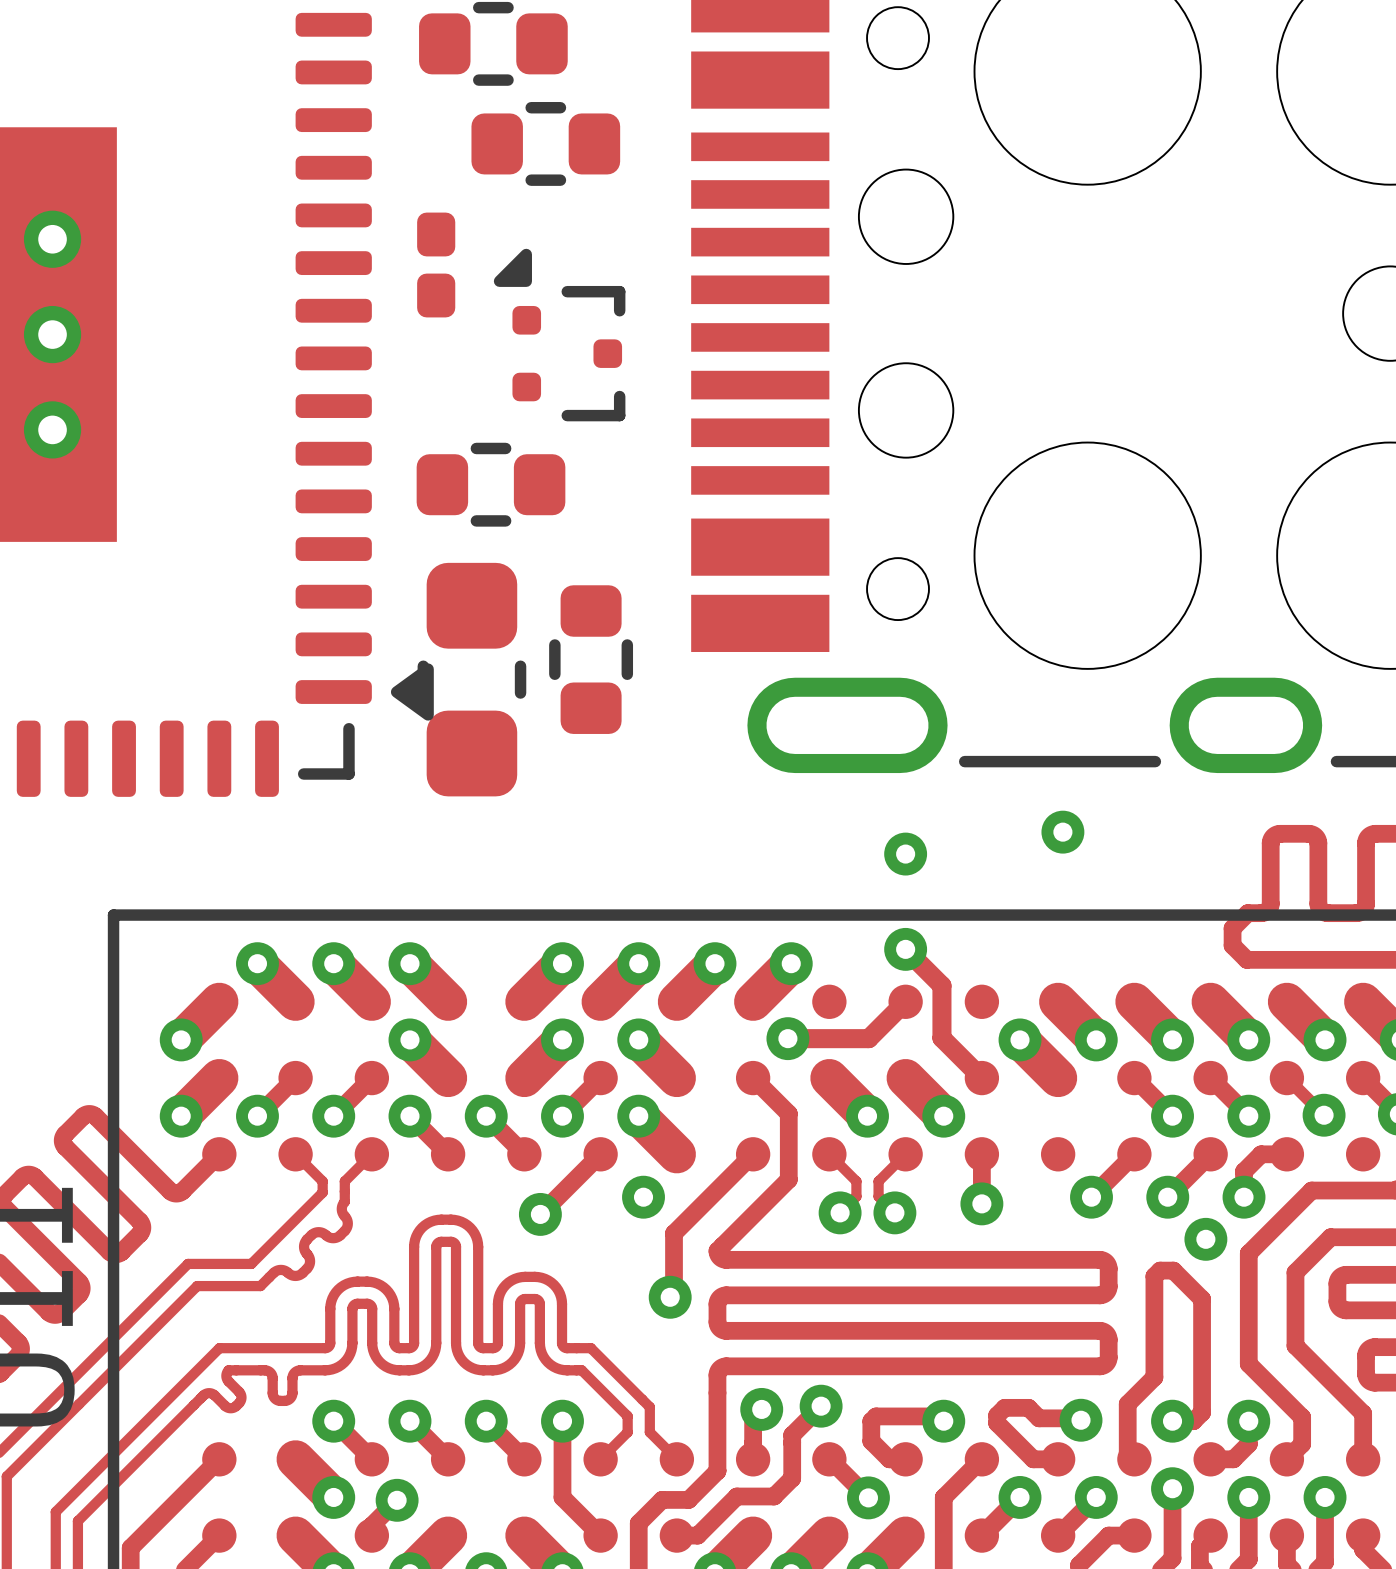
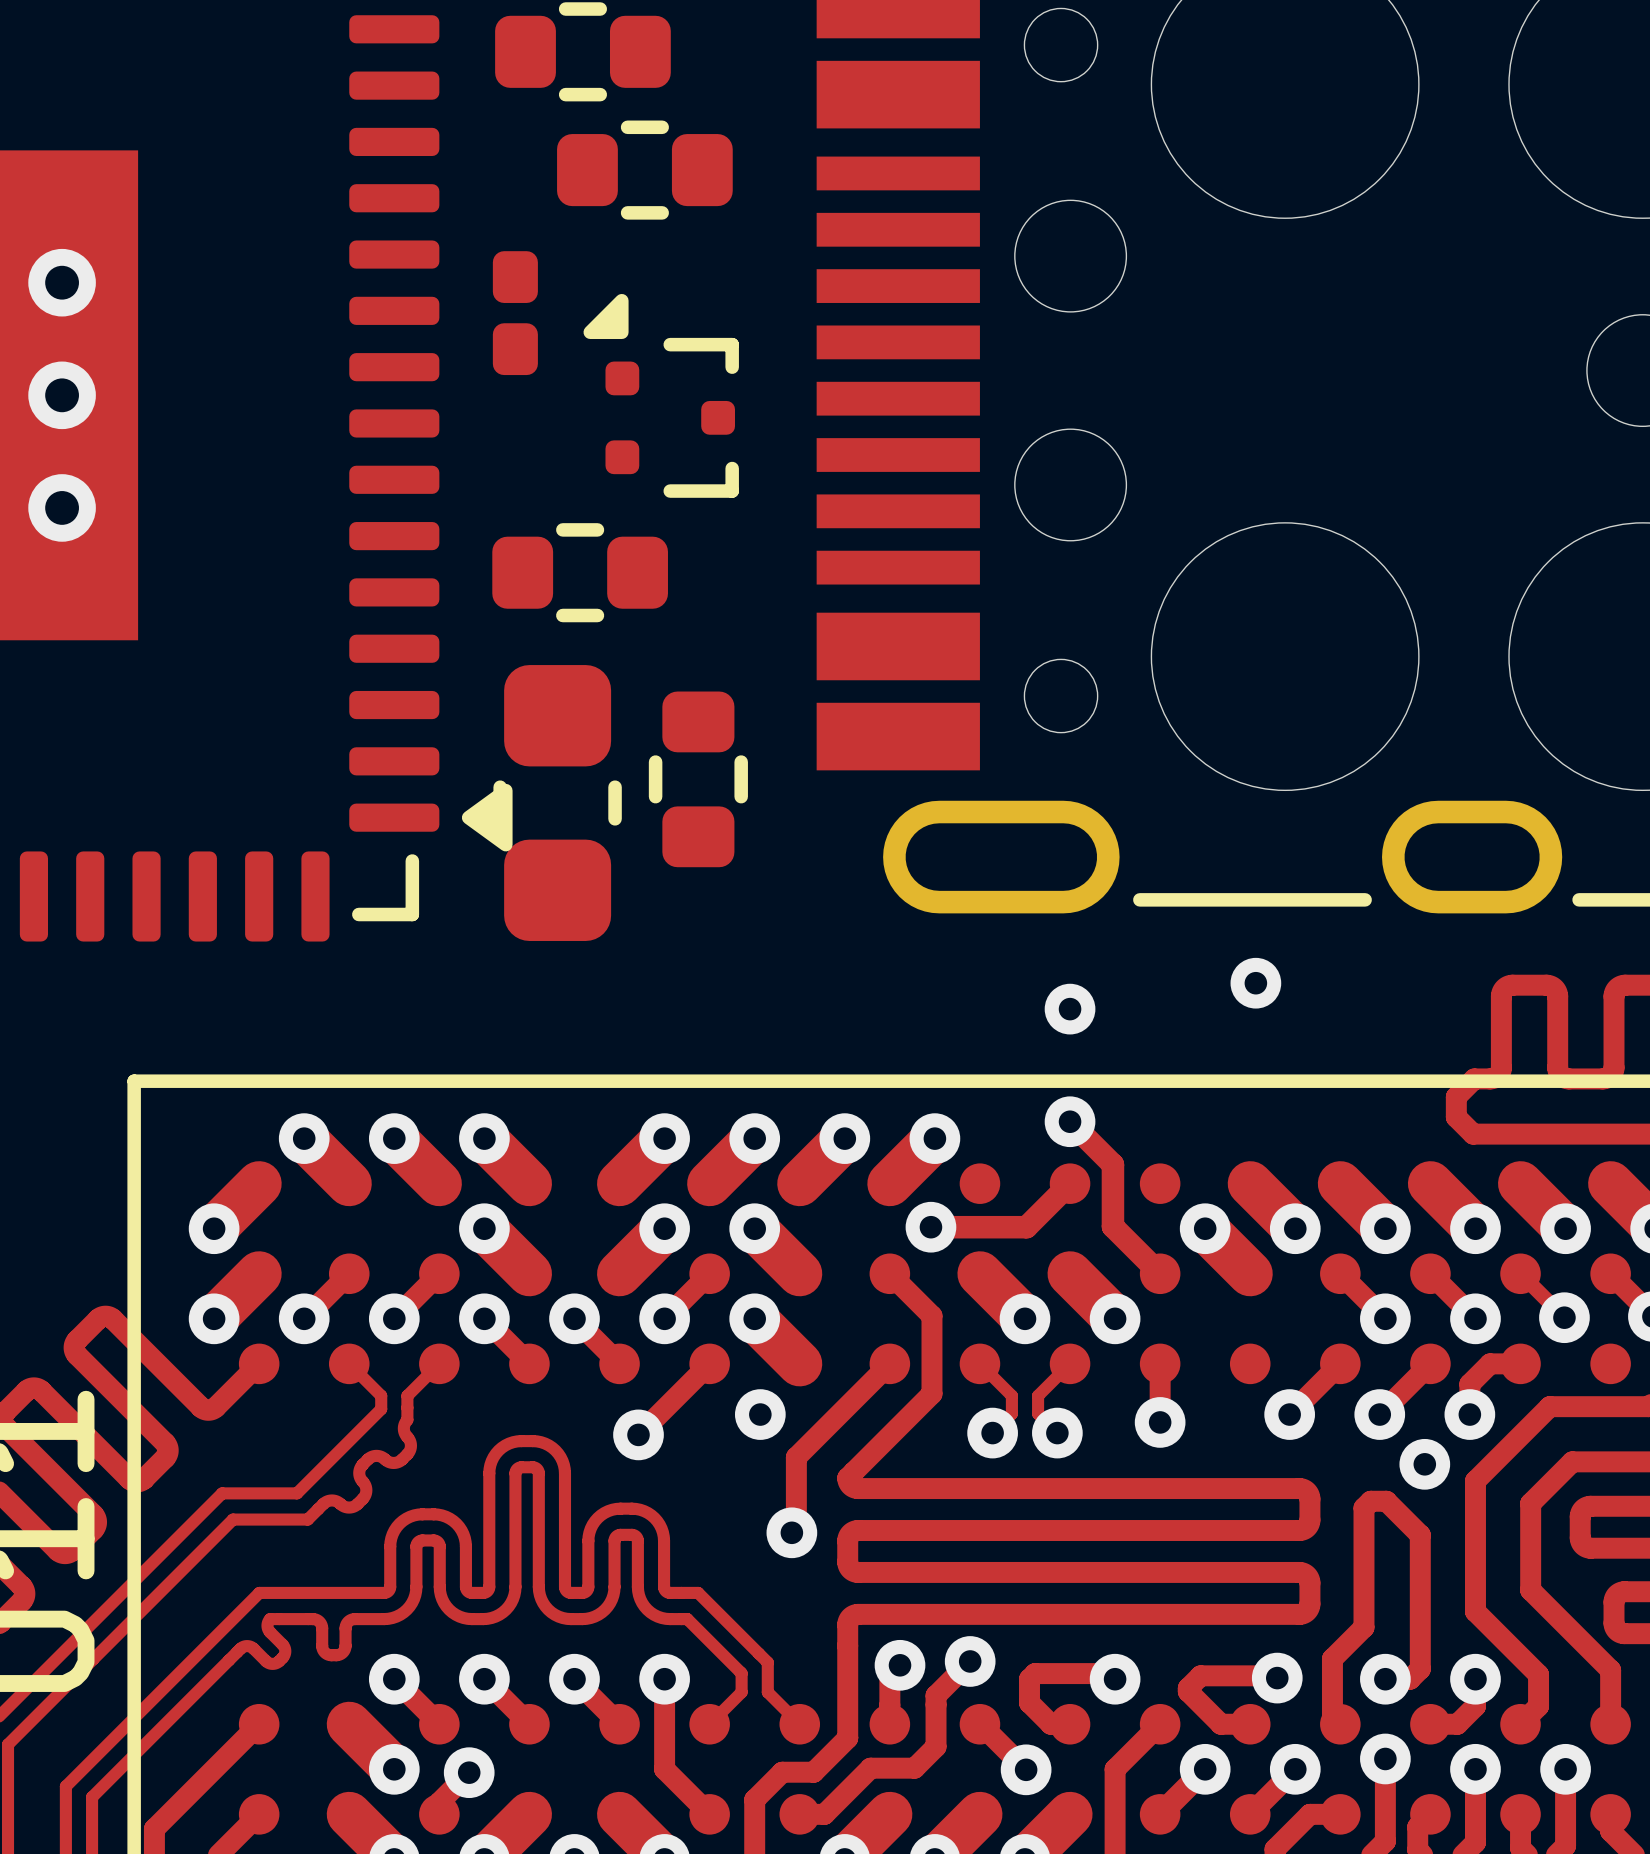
track: (1039, 1418) (1028, 1407) (1004, 1407) (997, 1415) (997, 1423) (1005, 1431) -> (1227, 1675) (1200, 1675) (1188, 1688) (1188, 1691)

